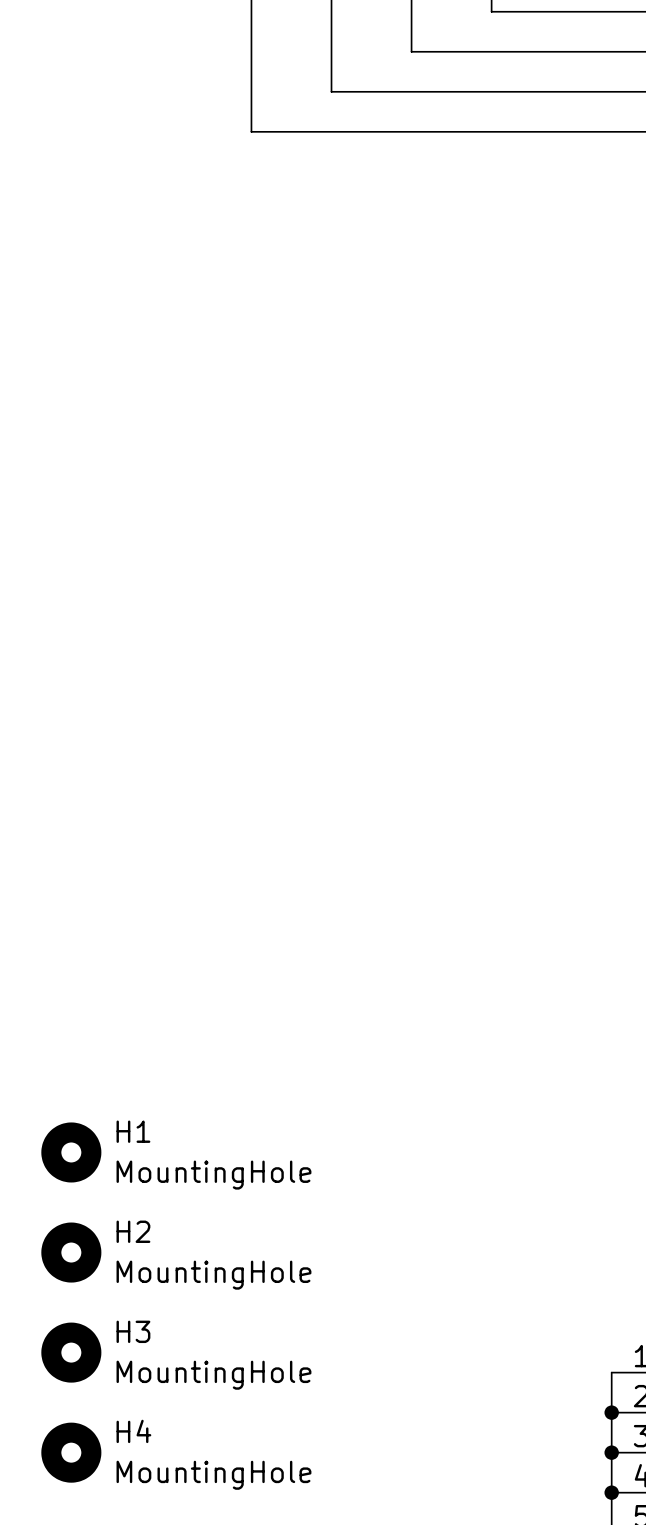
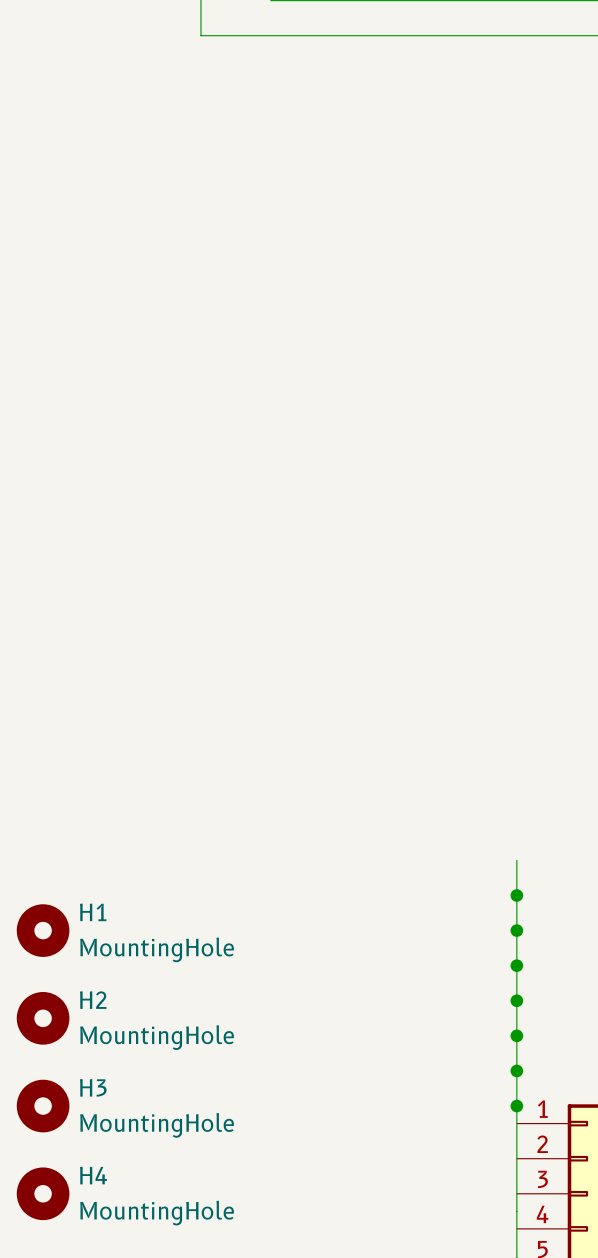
wire: none -> (516, 860) (516, 1123)
junction: none -> (516, 895)
junction: none -> (516, 930)
junction: none -> (516, 965)
junction: none -> (516, 1000)
junction: none -> (516, 1035)
junction: none -> (516, 1070)
junction: none -> (516, 1106)
junction: (611, 1412) -> none
junction: (611, 1452) -> none
junction: (611, 1492) -> none

